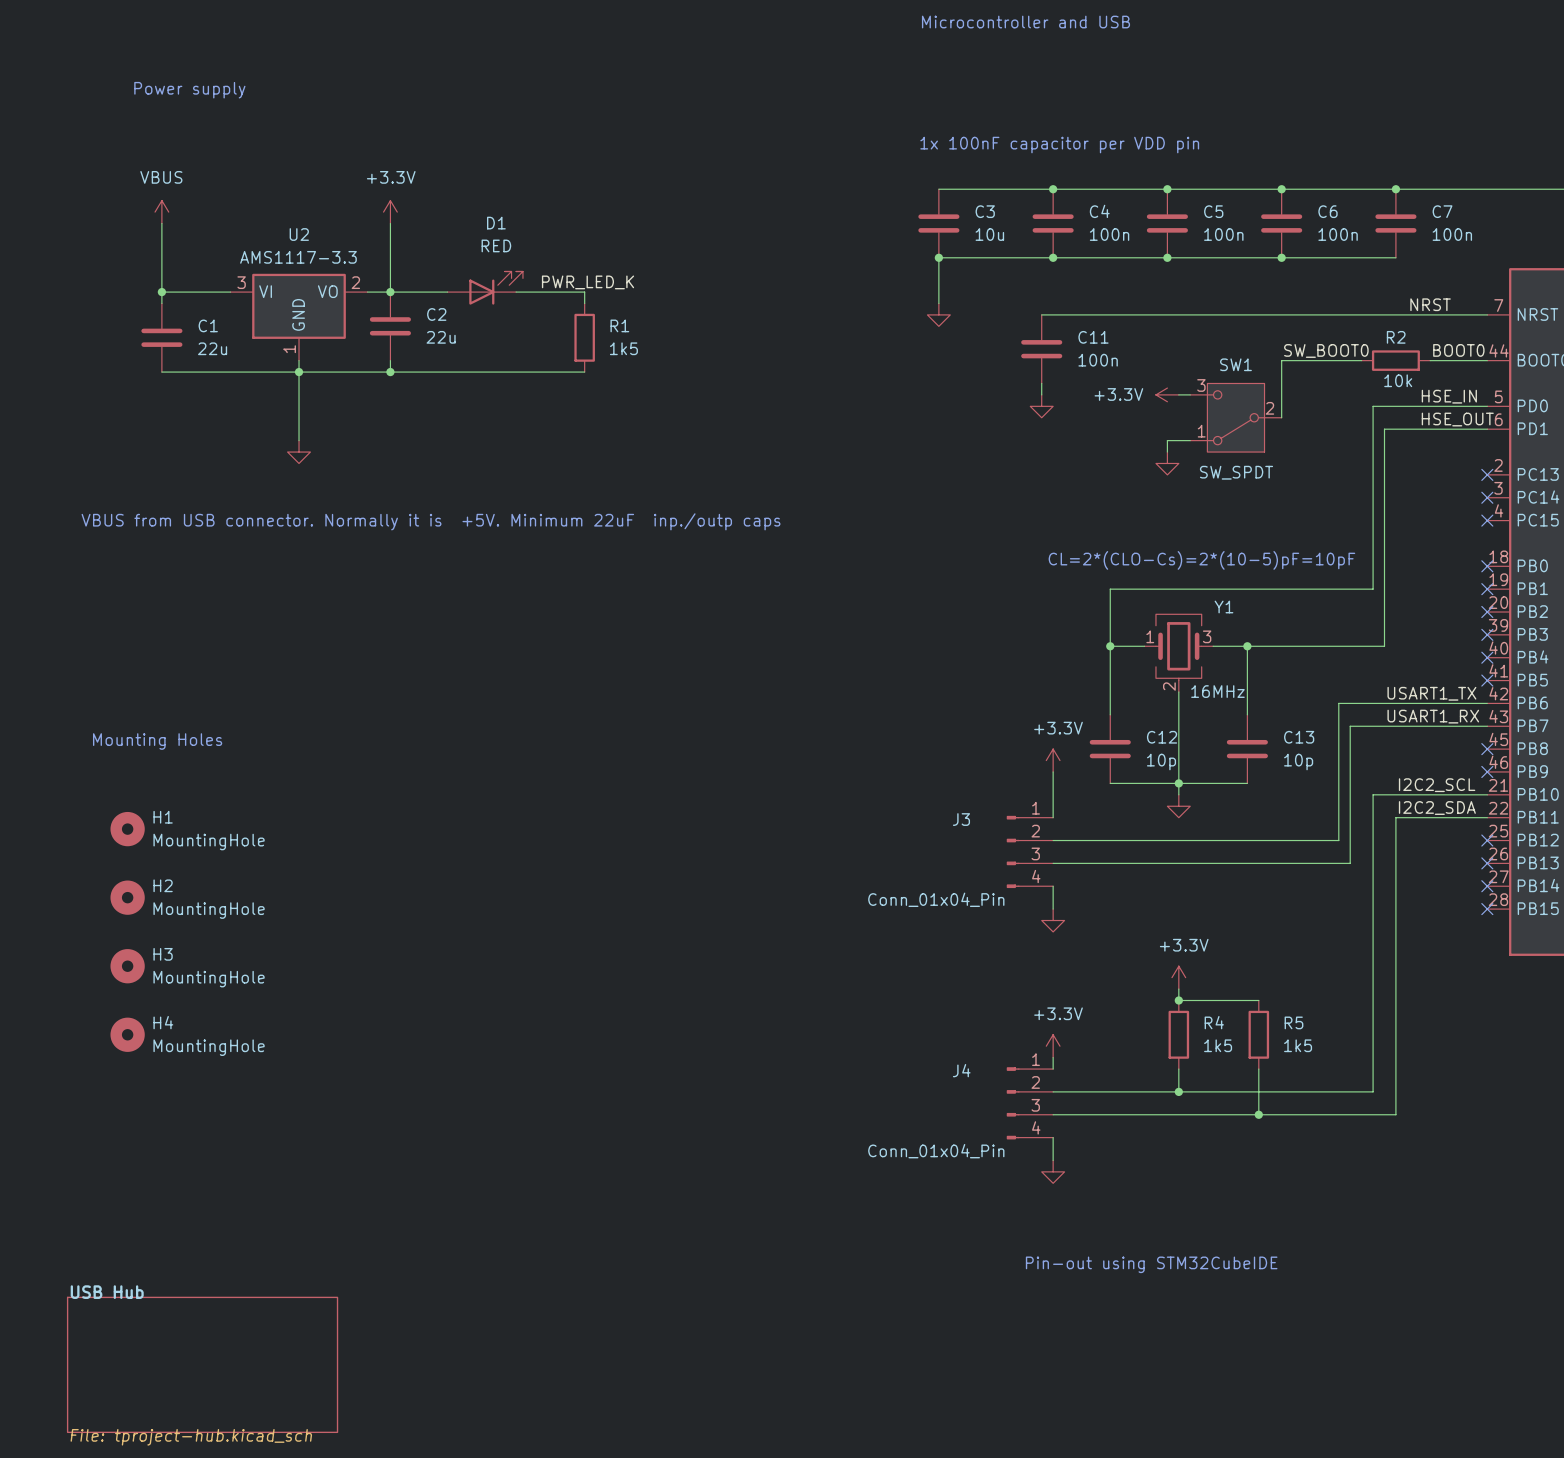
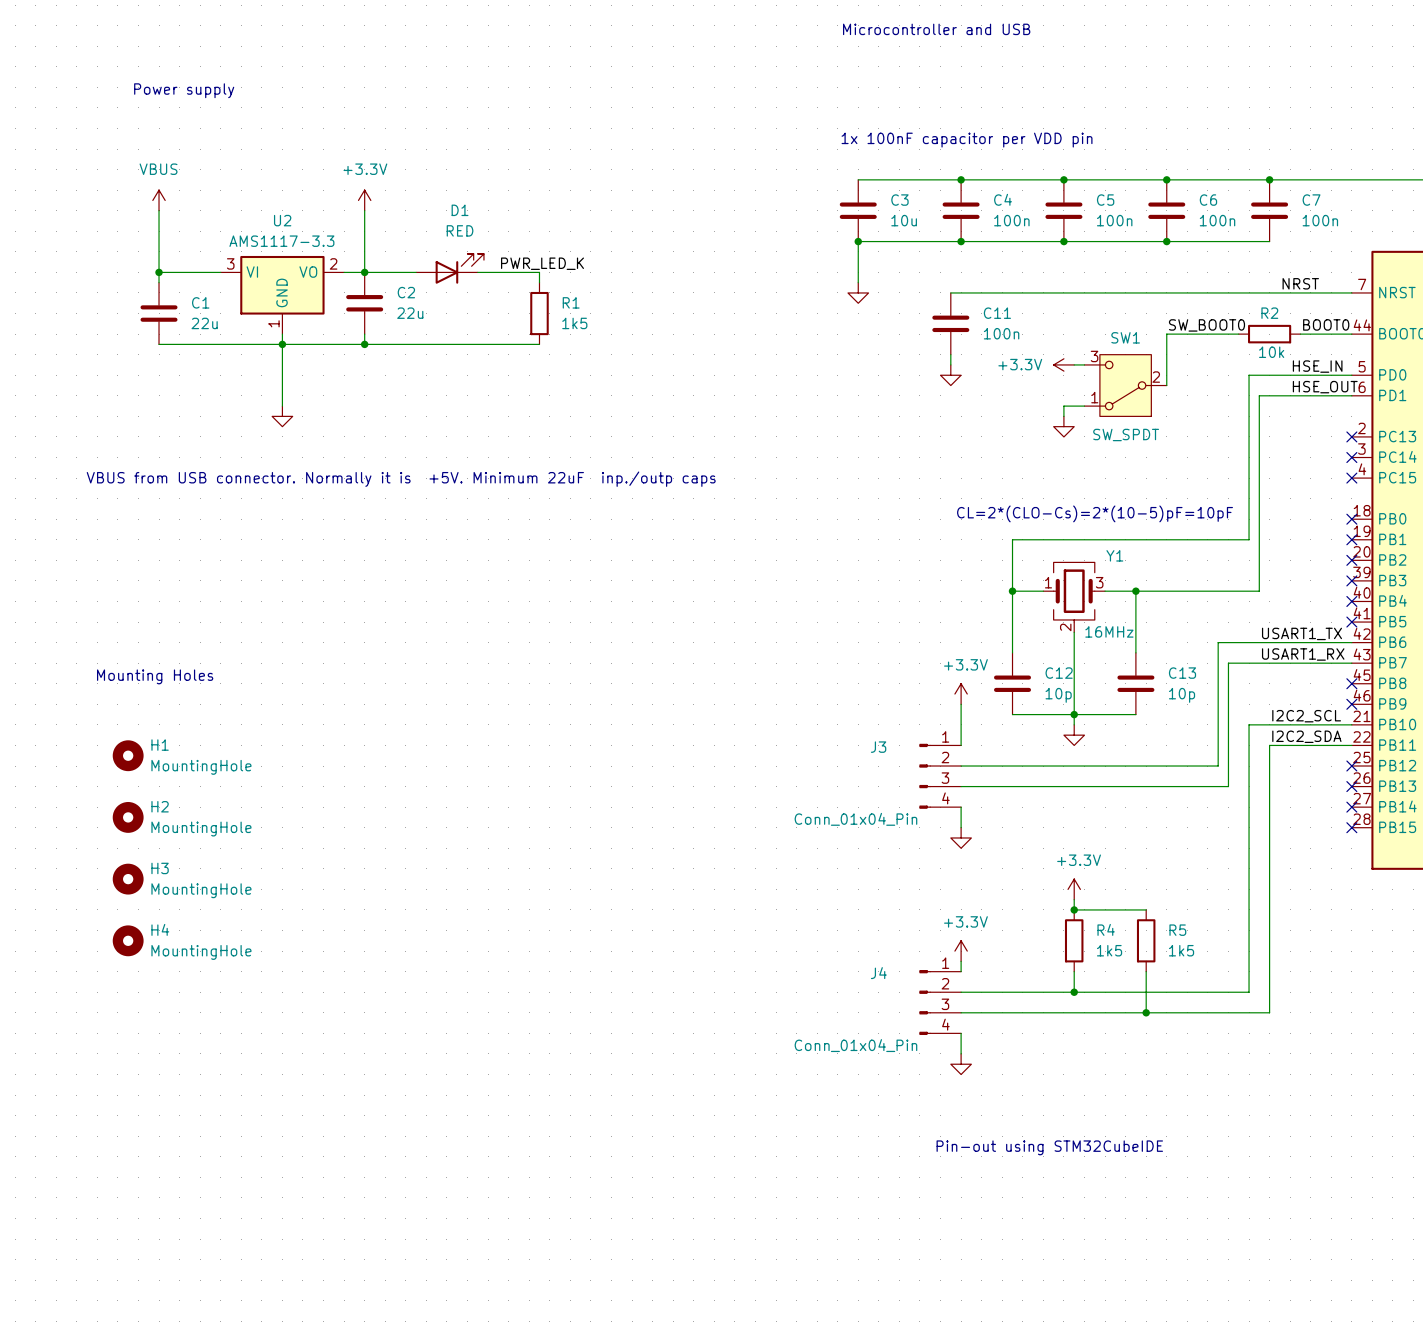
sheet USB Hub: File: tproject-hub.kicad_sch (202, 1364) -> none

